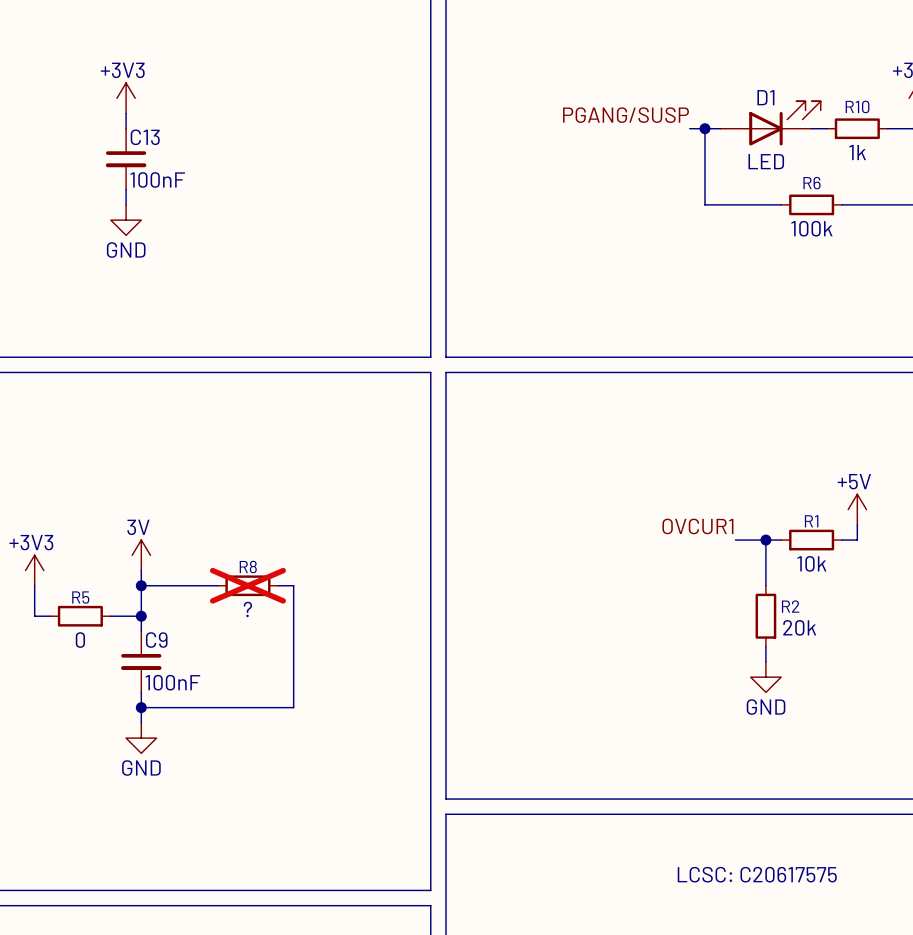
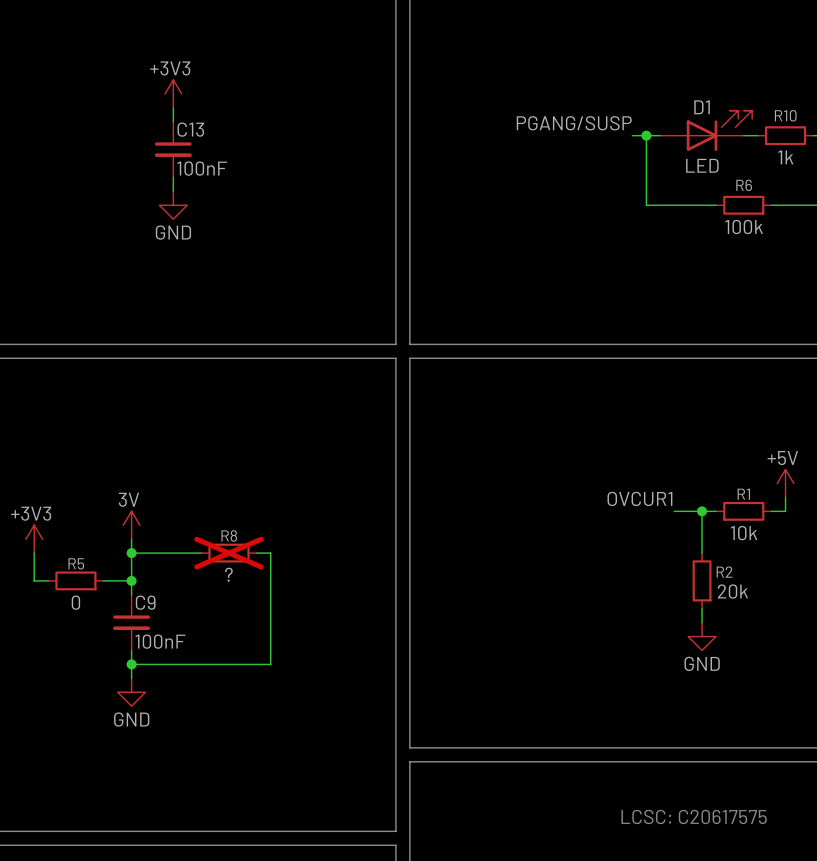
power symbol position: +3V3 (126, 98) -> +3V3 (173, 93)
wire: (126, 113) (126, 128) -> (173, 107) (173, 121)
C13 position: (126, 159) -> (173, 149)
wire: (126, 189) (126, 204) -> (173, 177) (173, 191)
power symbol position: GND (126, 220) -> GND (173, 205)

